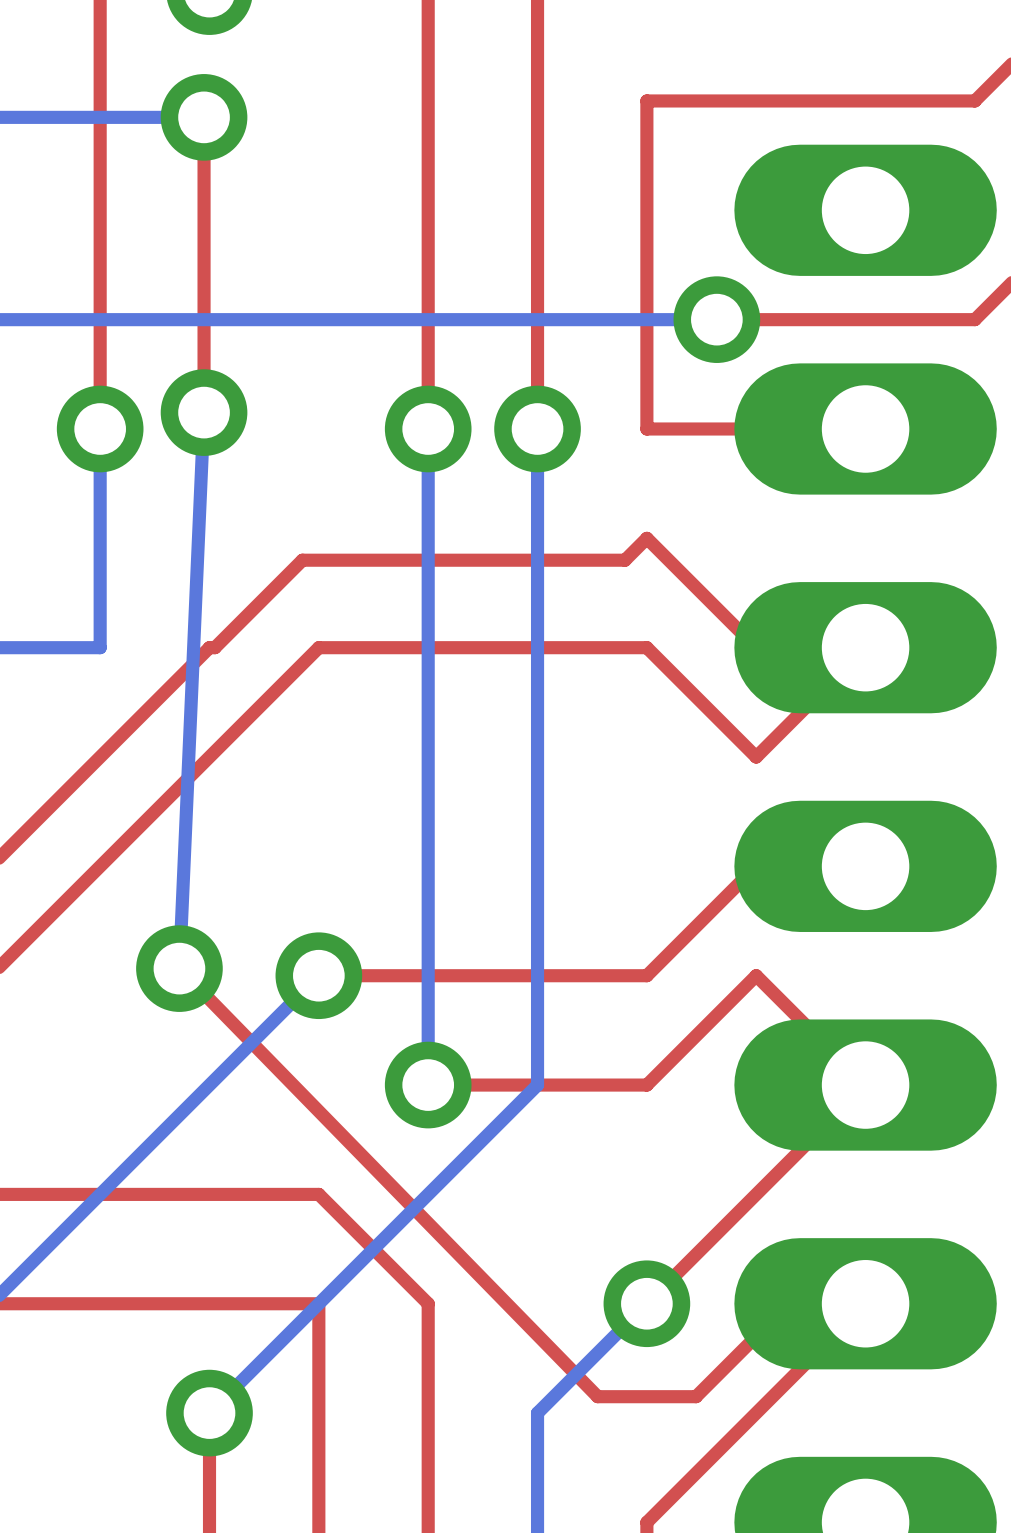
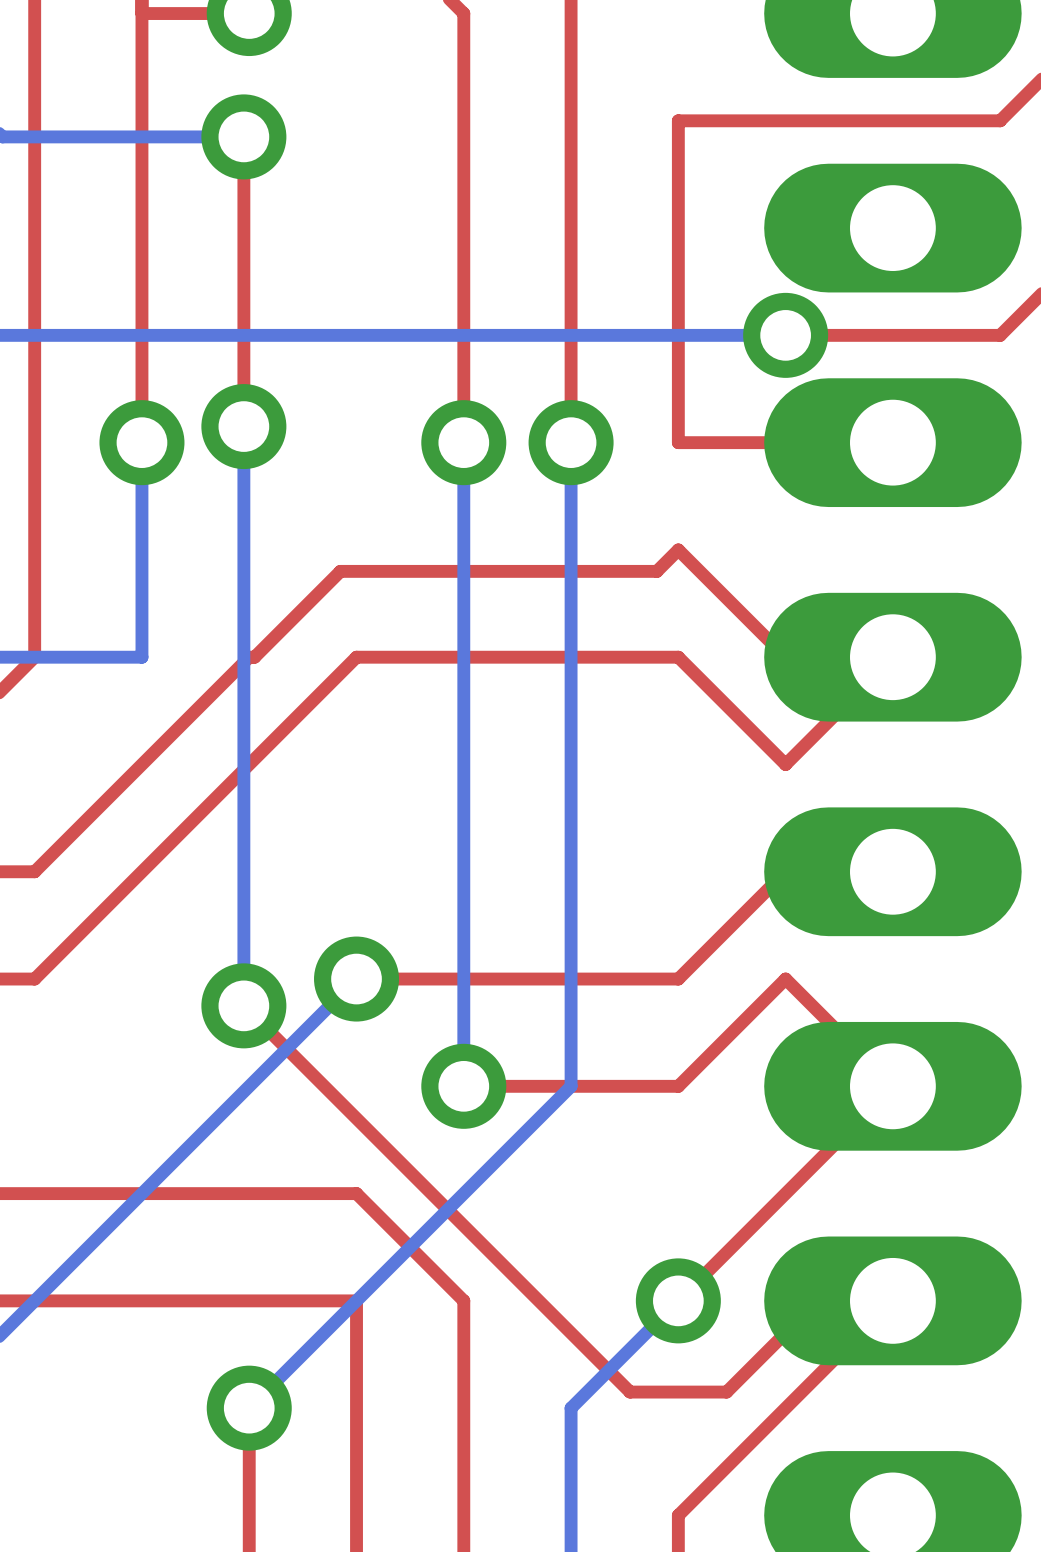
via position: (716, 319) -> (785, 335)
bottom track: (204, 412) (179, 968) -> (243, 426) (243, 1005)
top track: (179, 968) (597, 1396) -> (243, 1005) (630, 1392)
via position: (179, 968) -> (243, 1005)

